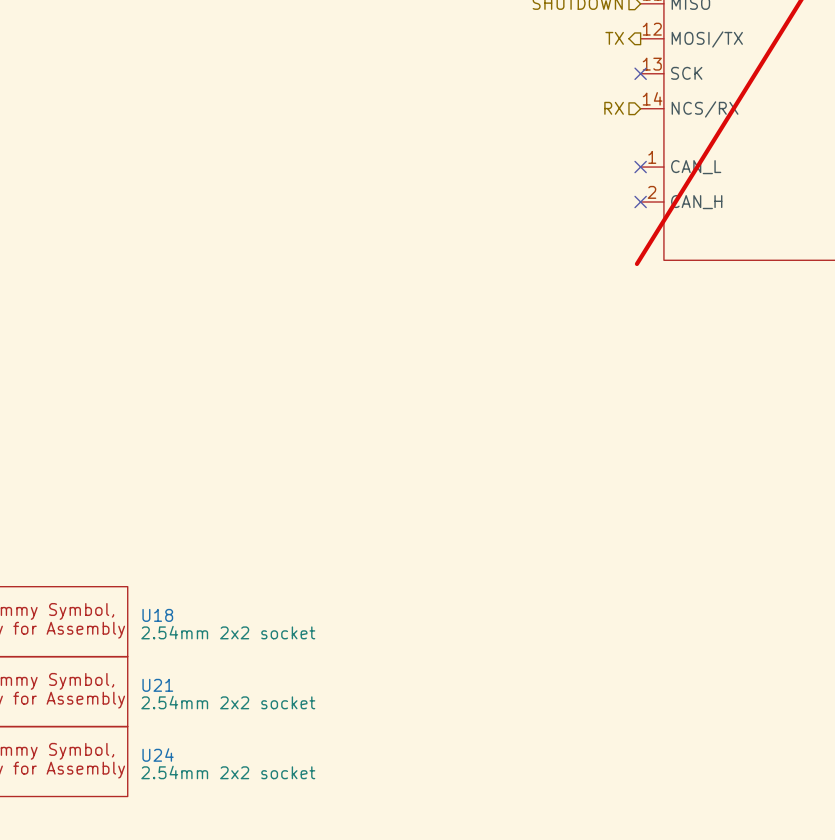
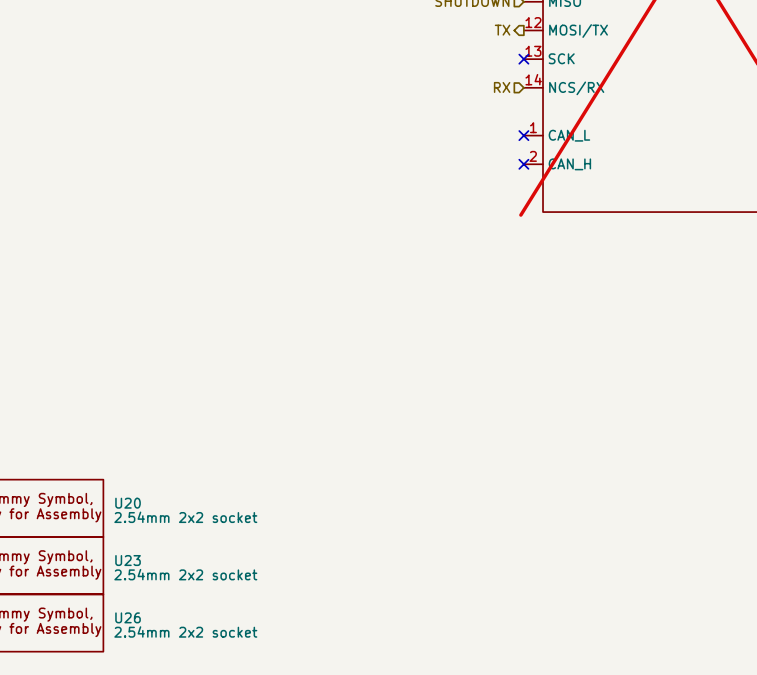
U18 name: U18 (157, 615) -> U20 (128, 503)
U21 name: U21 (157, 685) -> U23 (128, 560)
U24 name: U24 (158, 755) -> U26 (128, 617)

